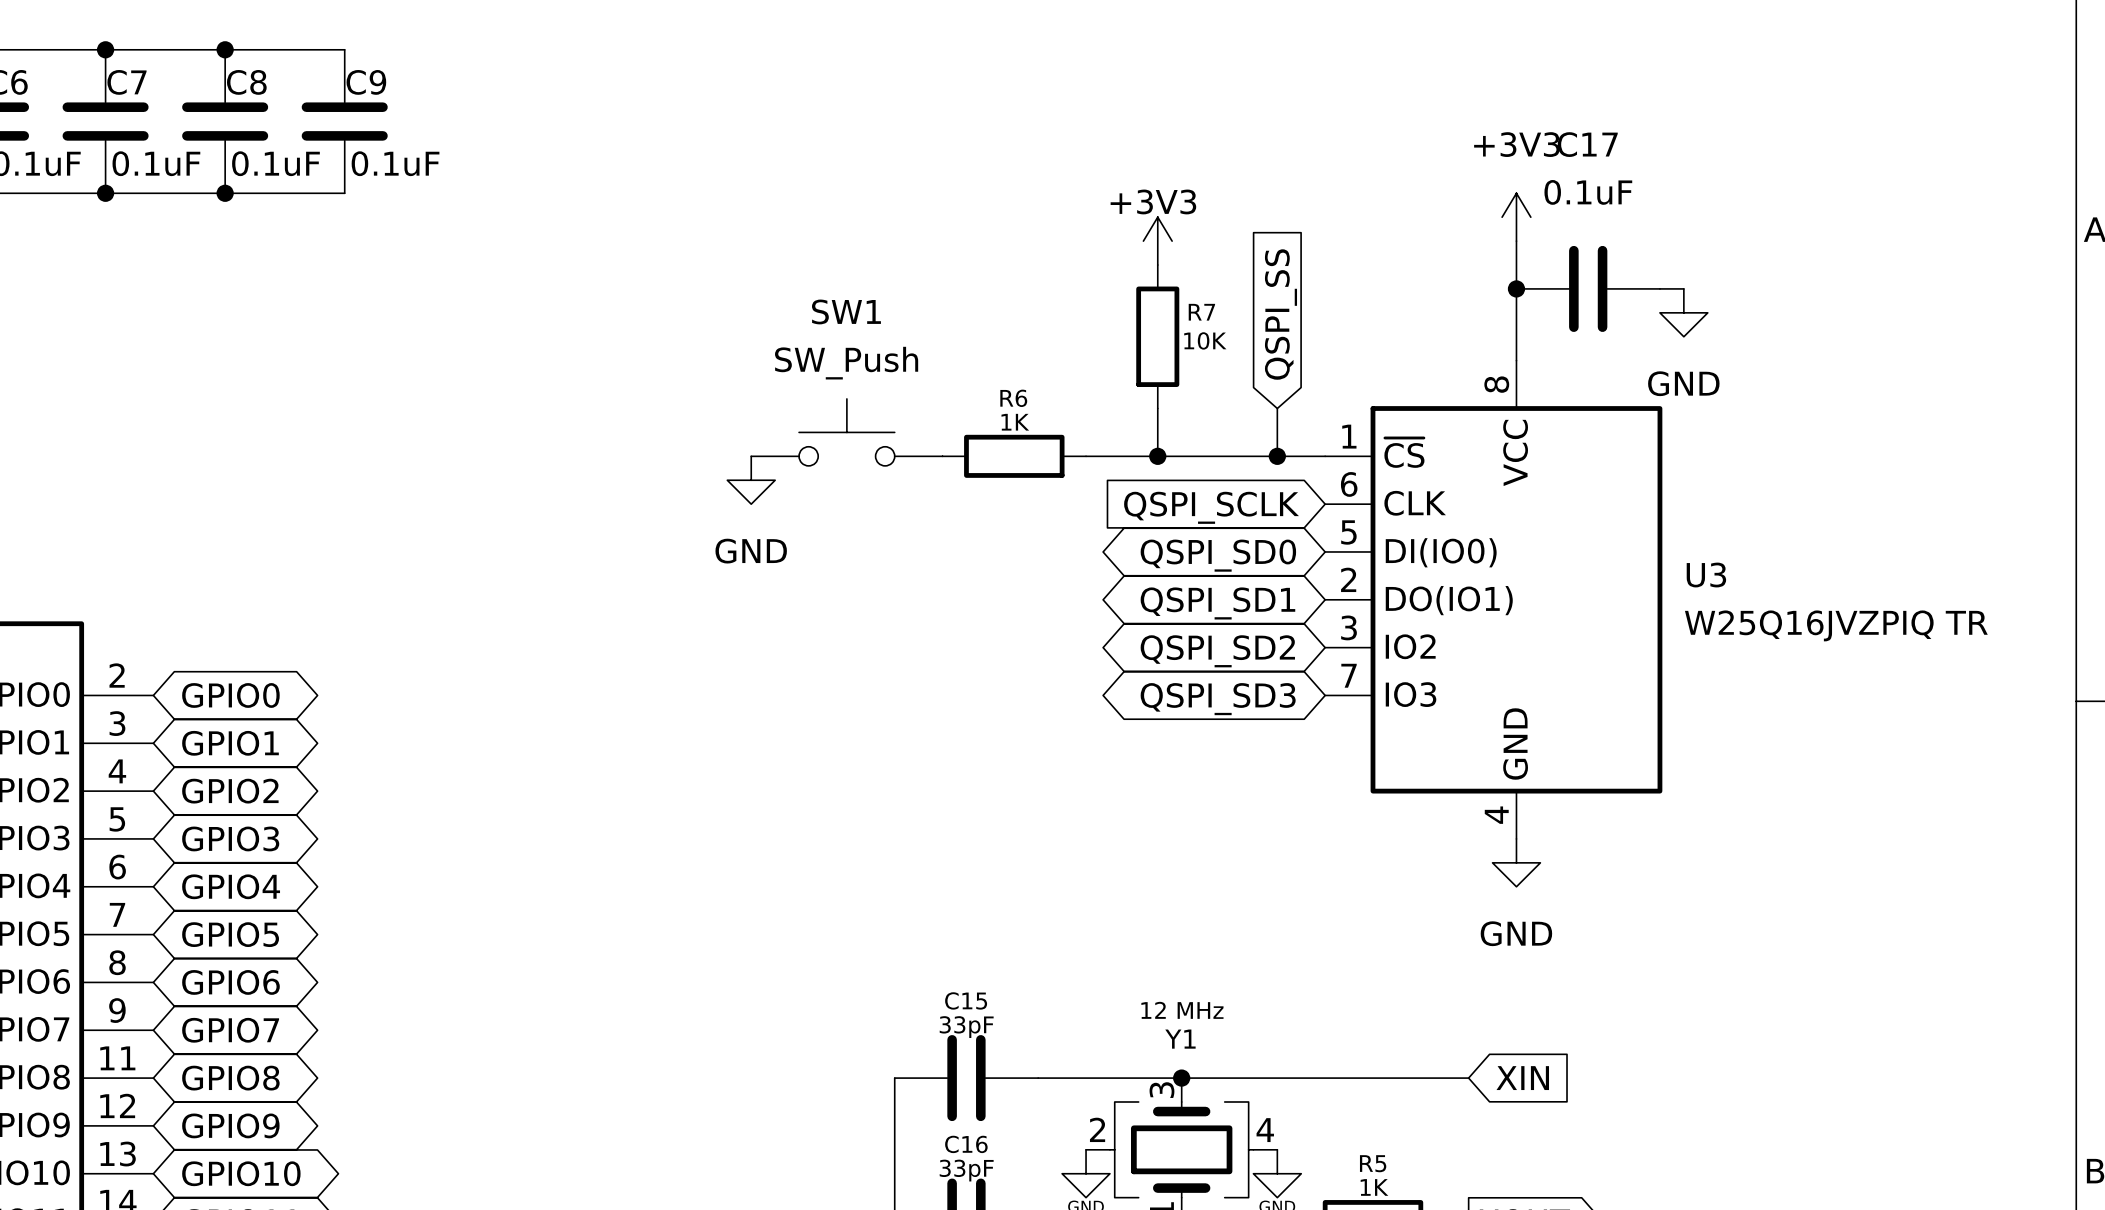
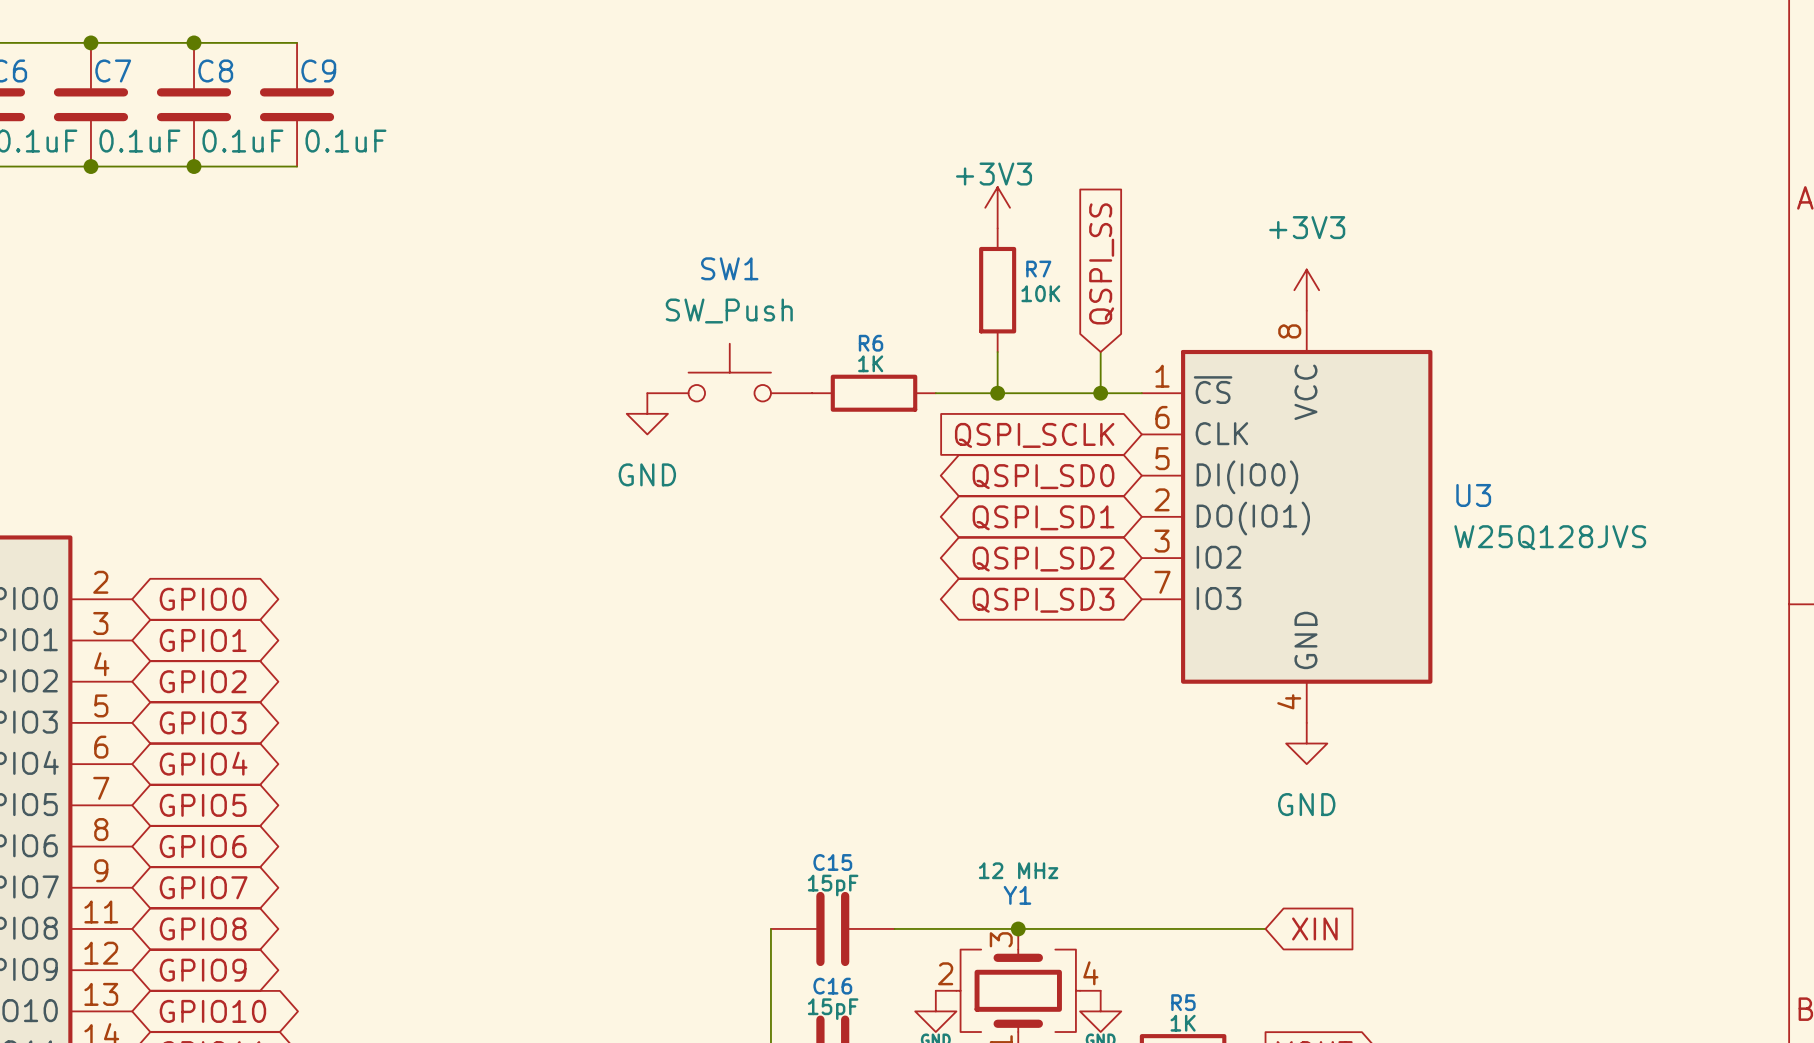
power symbol position: +3V3 (1516, 217) -> +3V3 (1306, 290)
wire: (1516, 241) (1516, 360) -> none
junction: (1516, 288) -> none
C17: 0.1uF (1588, 288) -> none
wire: (1659, 288) (1683, 288) -> none
power symbol: GND (1683, 312) -> none
U3 value: W25Q16JVZPIQ TR (1836, 625) -> W25Q128JVS (1550, 537)
C15 value: 33pF (966, 1027) -> 15pF (833, 885)
C16 value: 33pF (966, 1170) -> 15pF (833, 1009)

